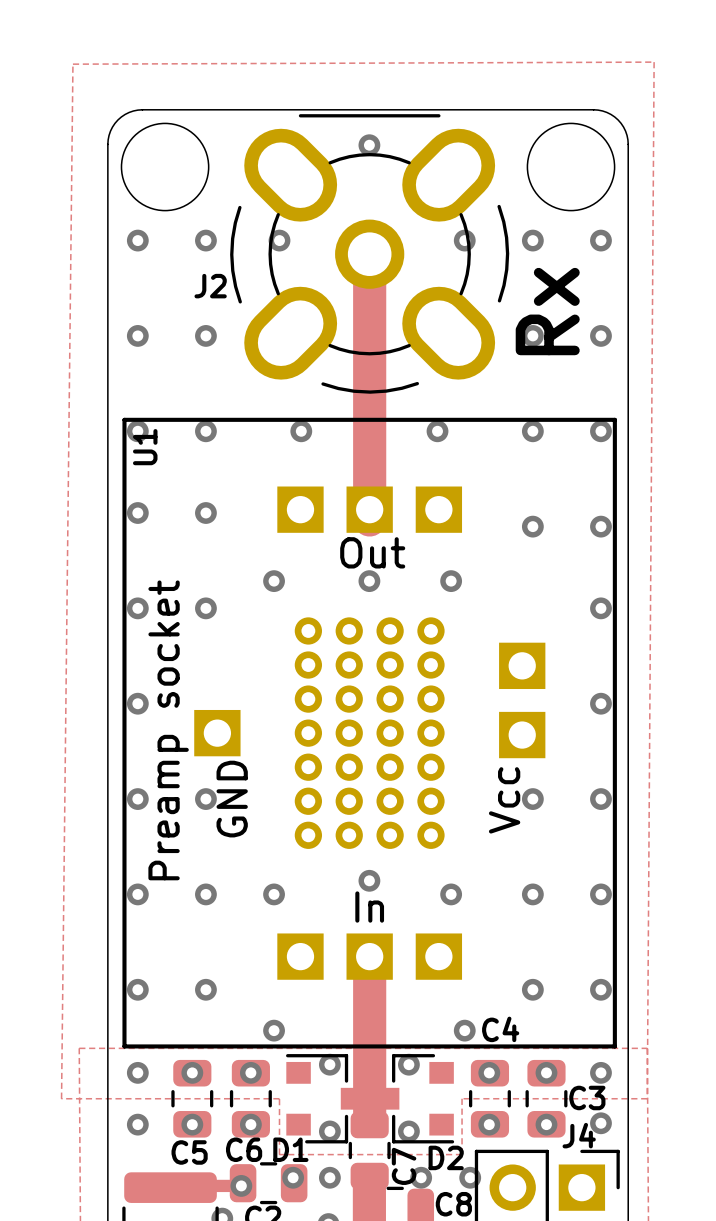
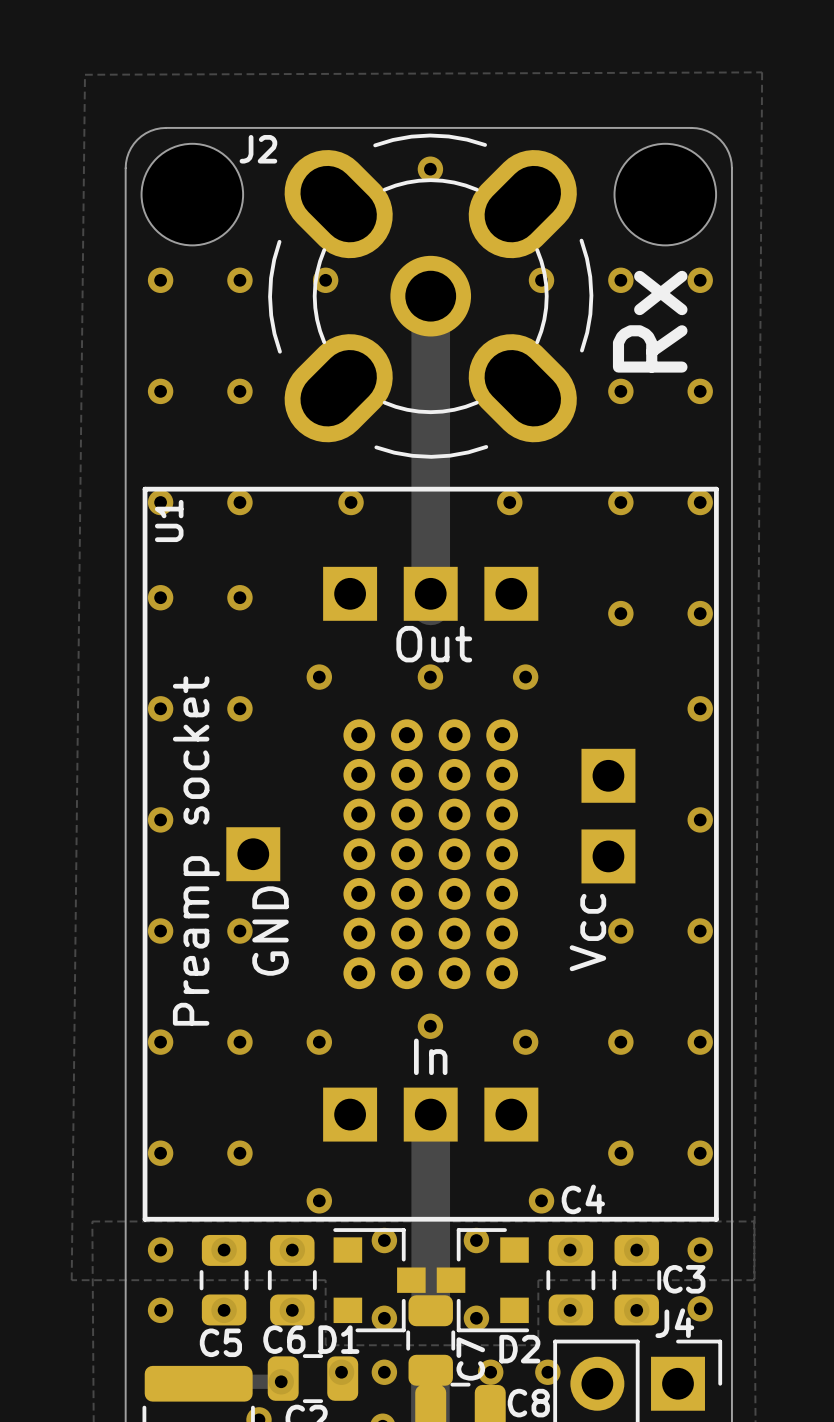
J2 footprint: [230, 114, 510, 394] -> [268, 133, 594, 459]
J2 name position: J2 (210, 286) -> J2 (258, 149)
J2 value position: Rx (547, 311) -> Rx (650, 321)

